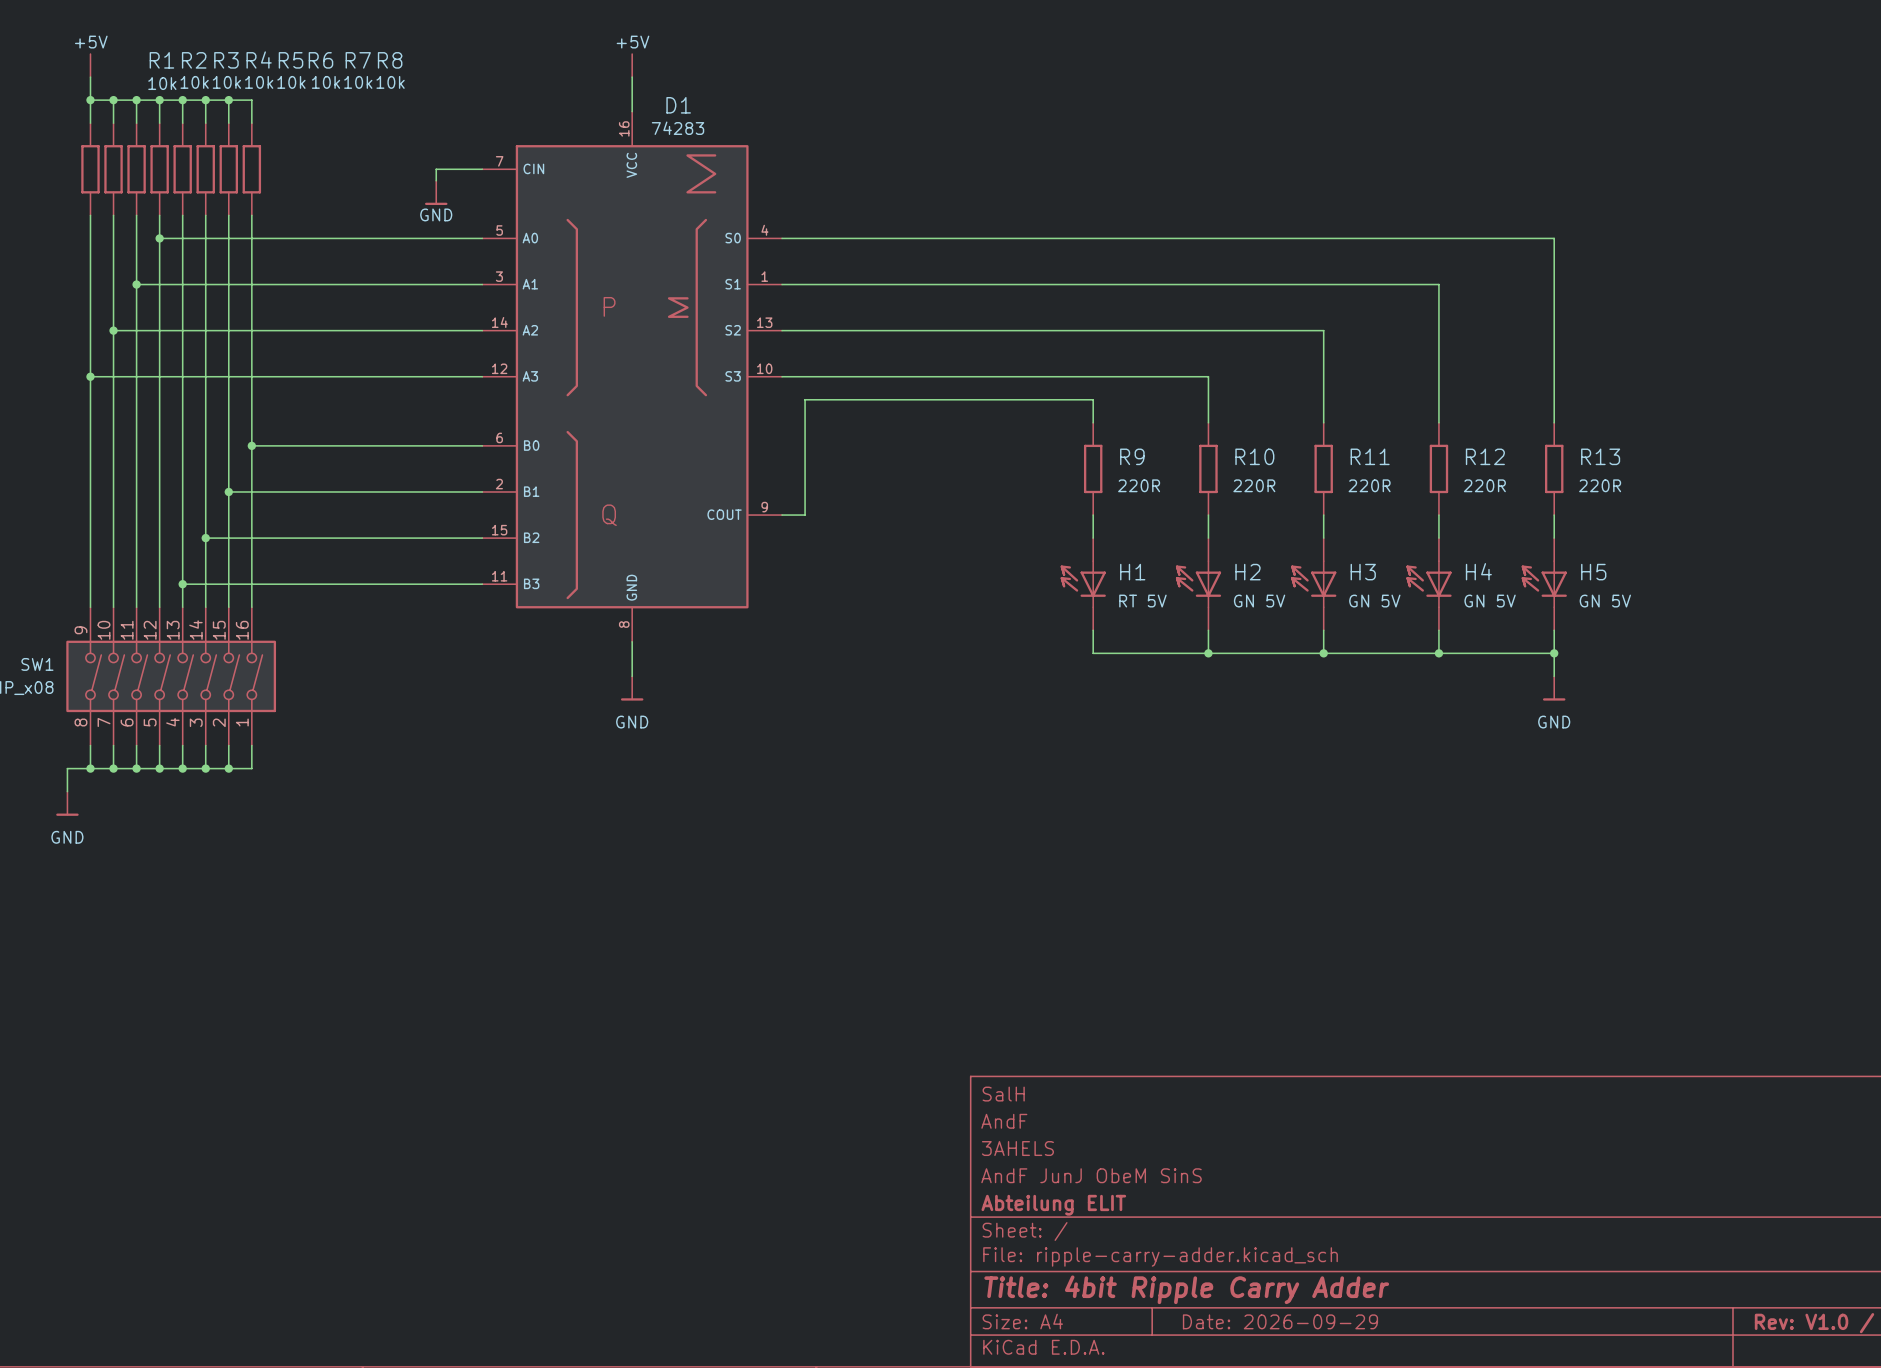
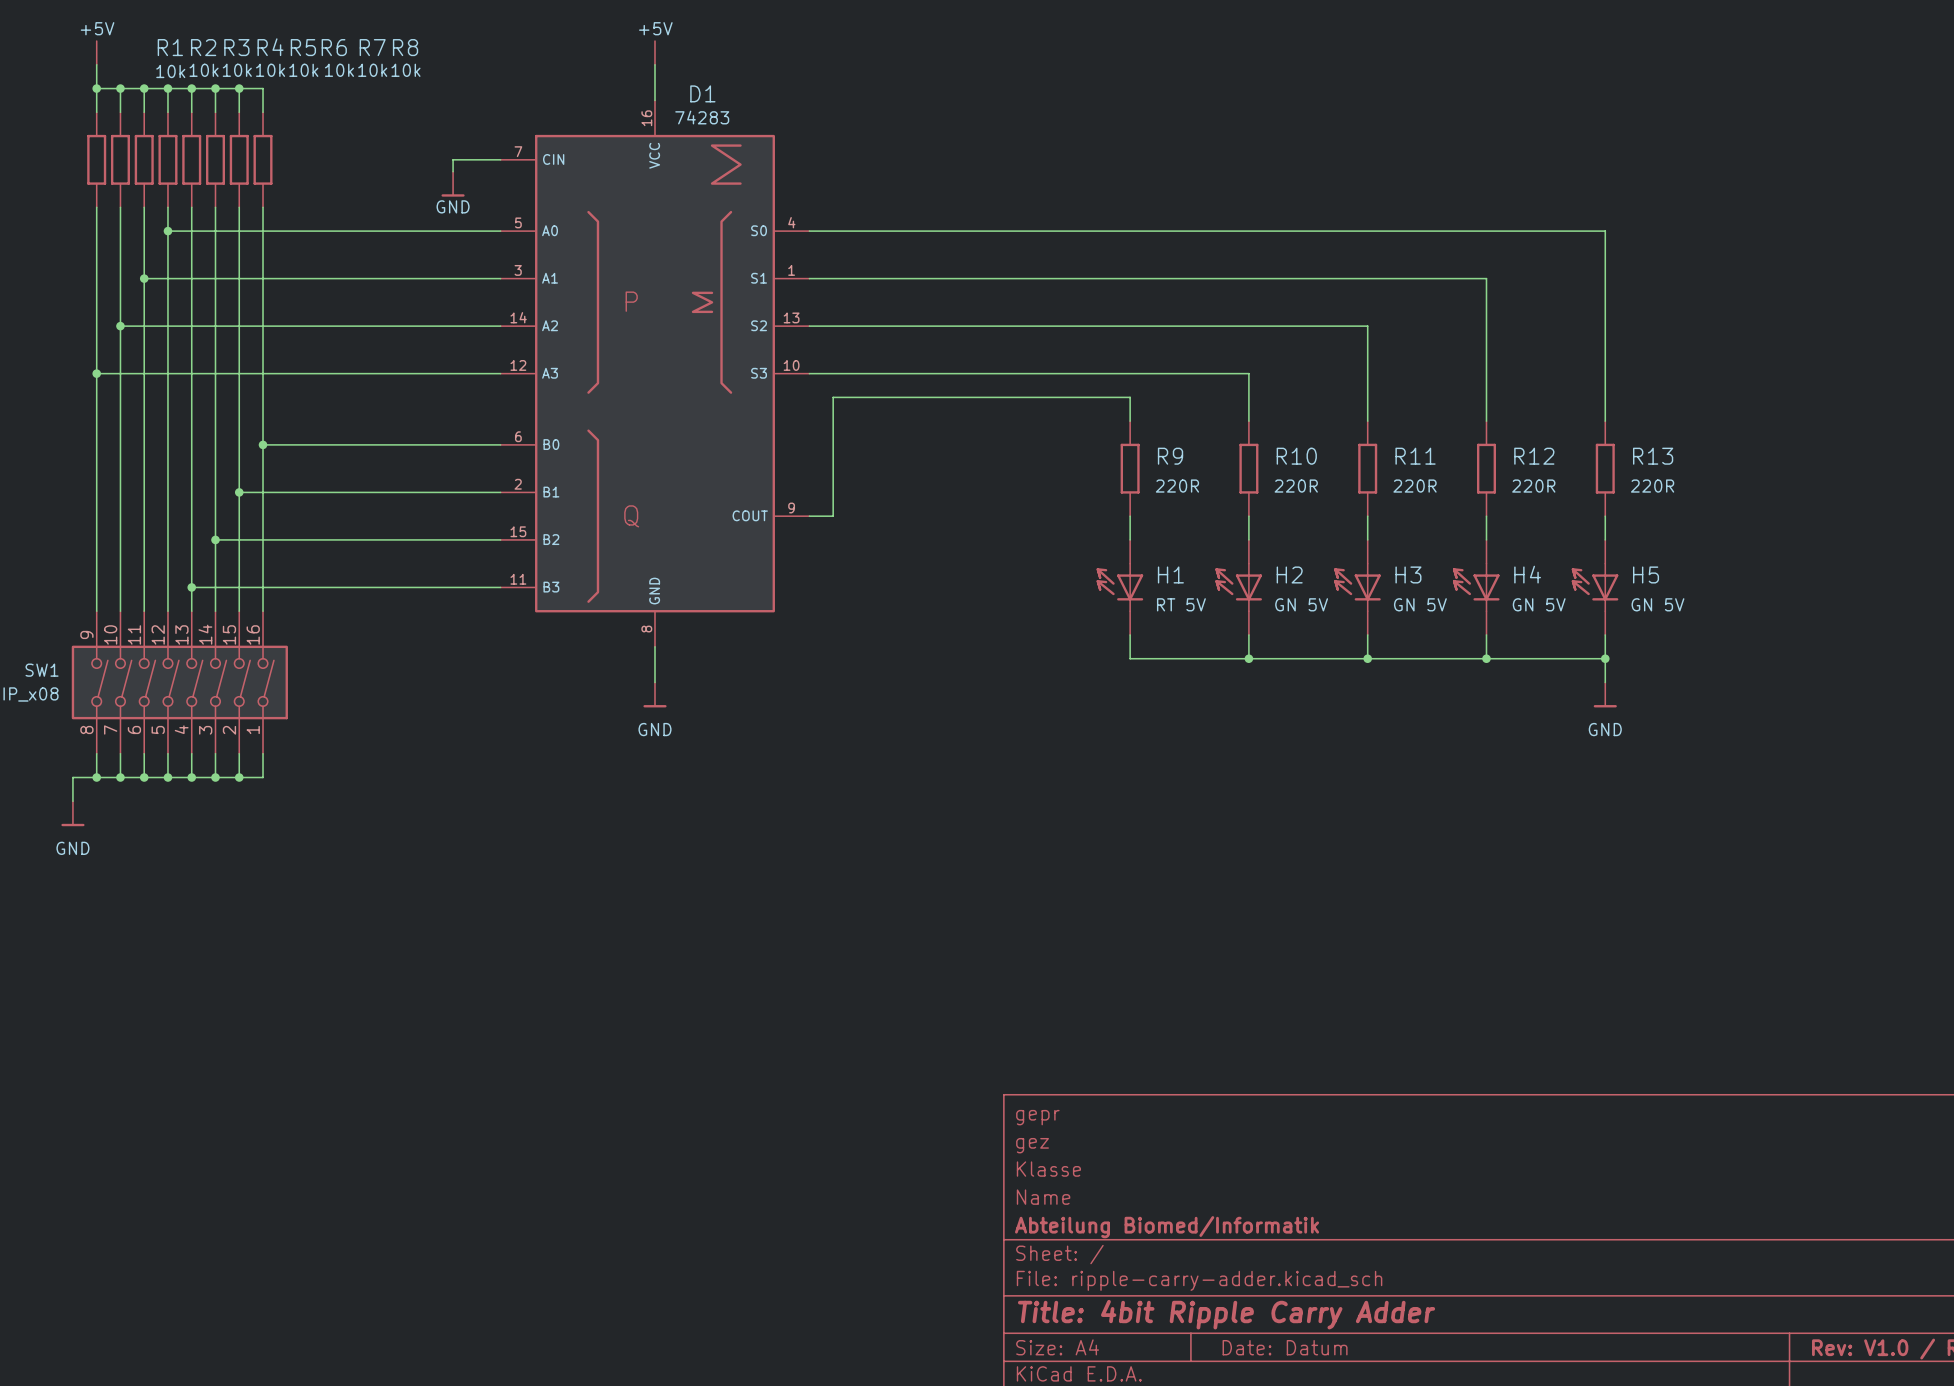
title block: SalH (1003, 1094) -> gepr (1037, 1117)
title block: AndF (1004, 1121) -> gez (1032, 1145)
title block: 3AHELS (1017, 1148) -> Klasse (1048, 1169)
title block: AndF JunJ ObeM SinS (1091, 1175) -> Name (1043, 1197)
title block: Abteilung ELIT (1053, 1205) -> Abteilung Biomed/Informatik (1167, 1227)
title block: Date: 2026-09-29 (1280, 1321) -> Date: Datum (1285, 1347)

